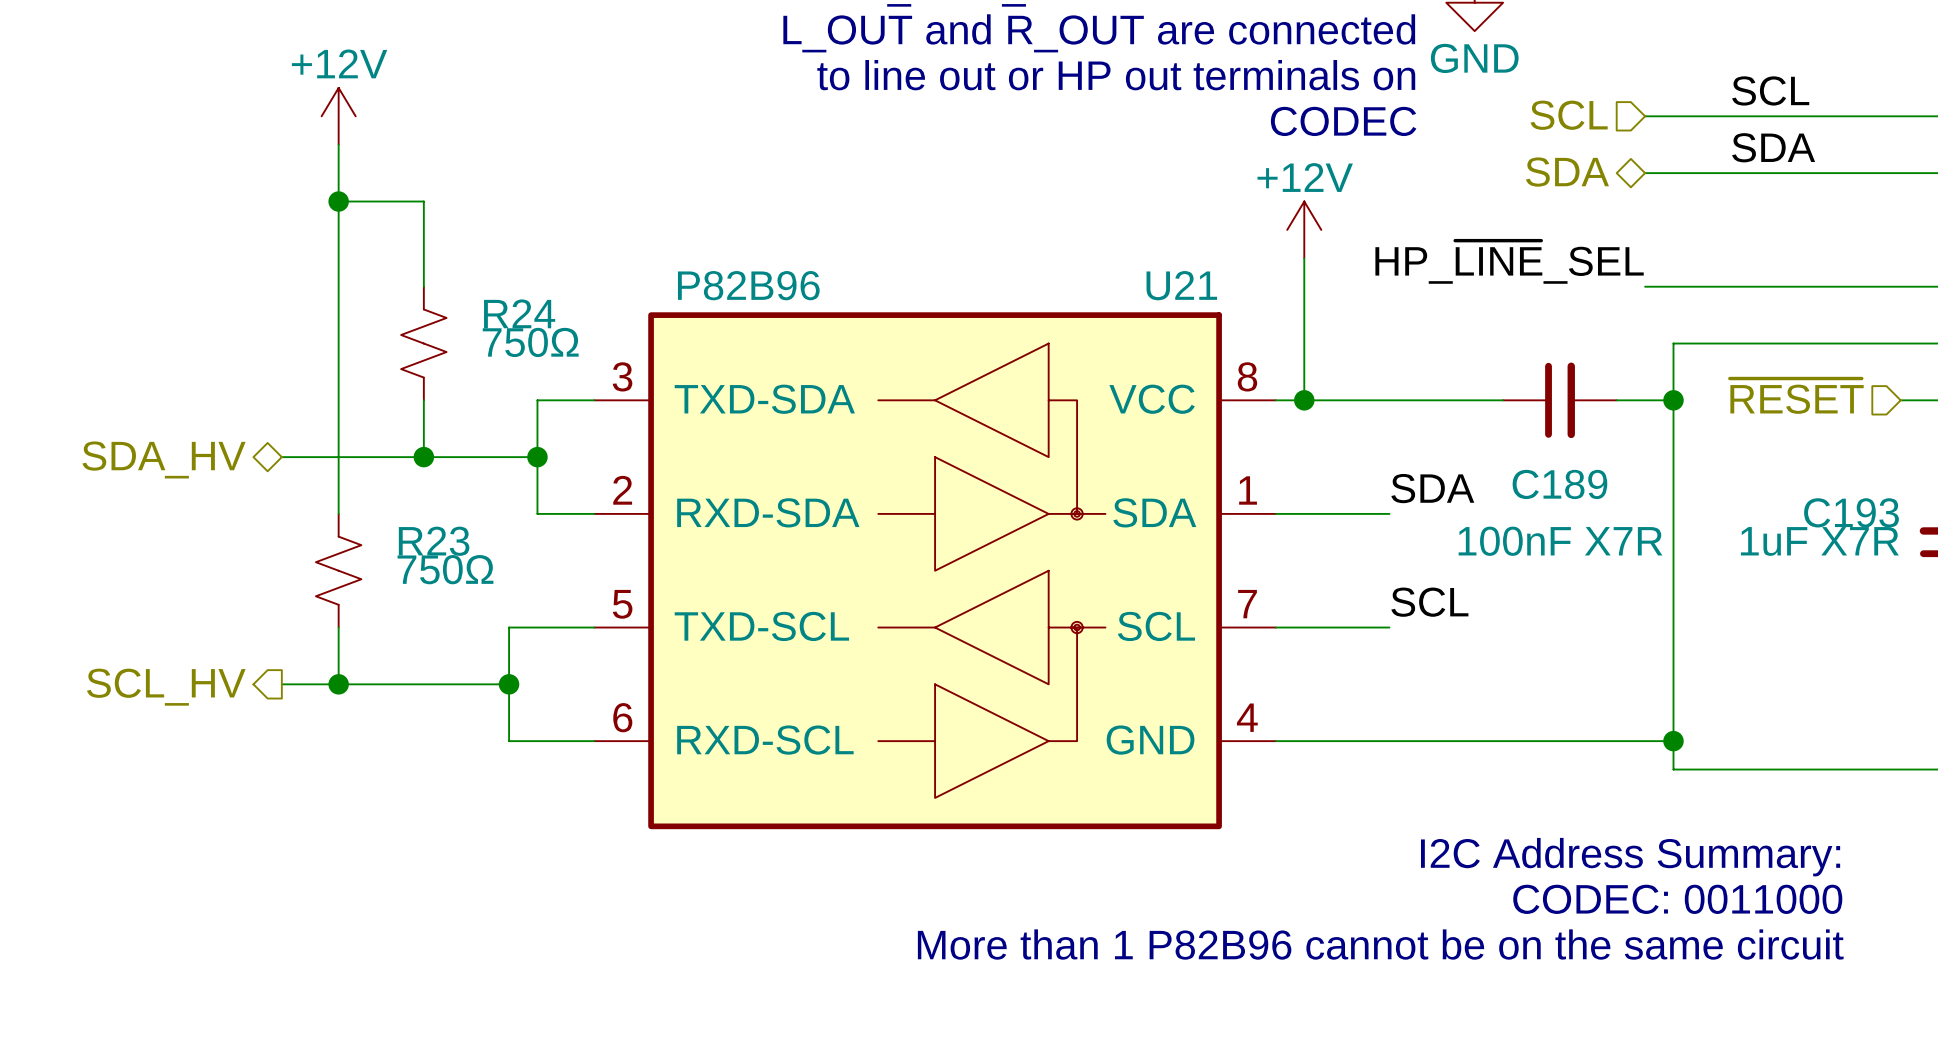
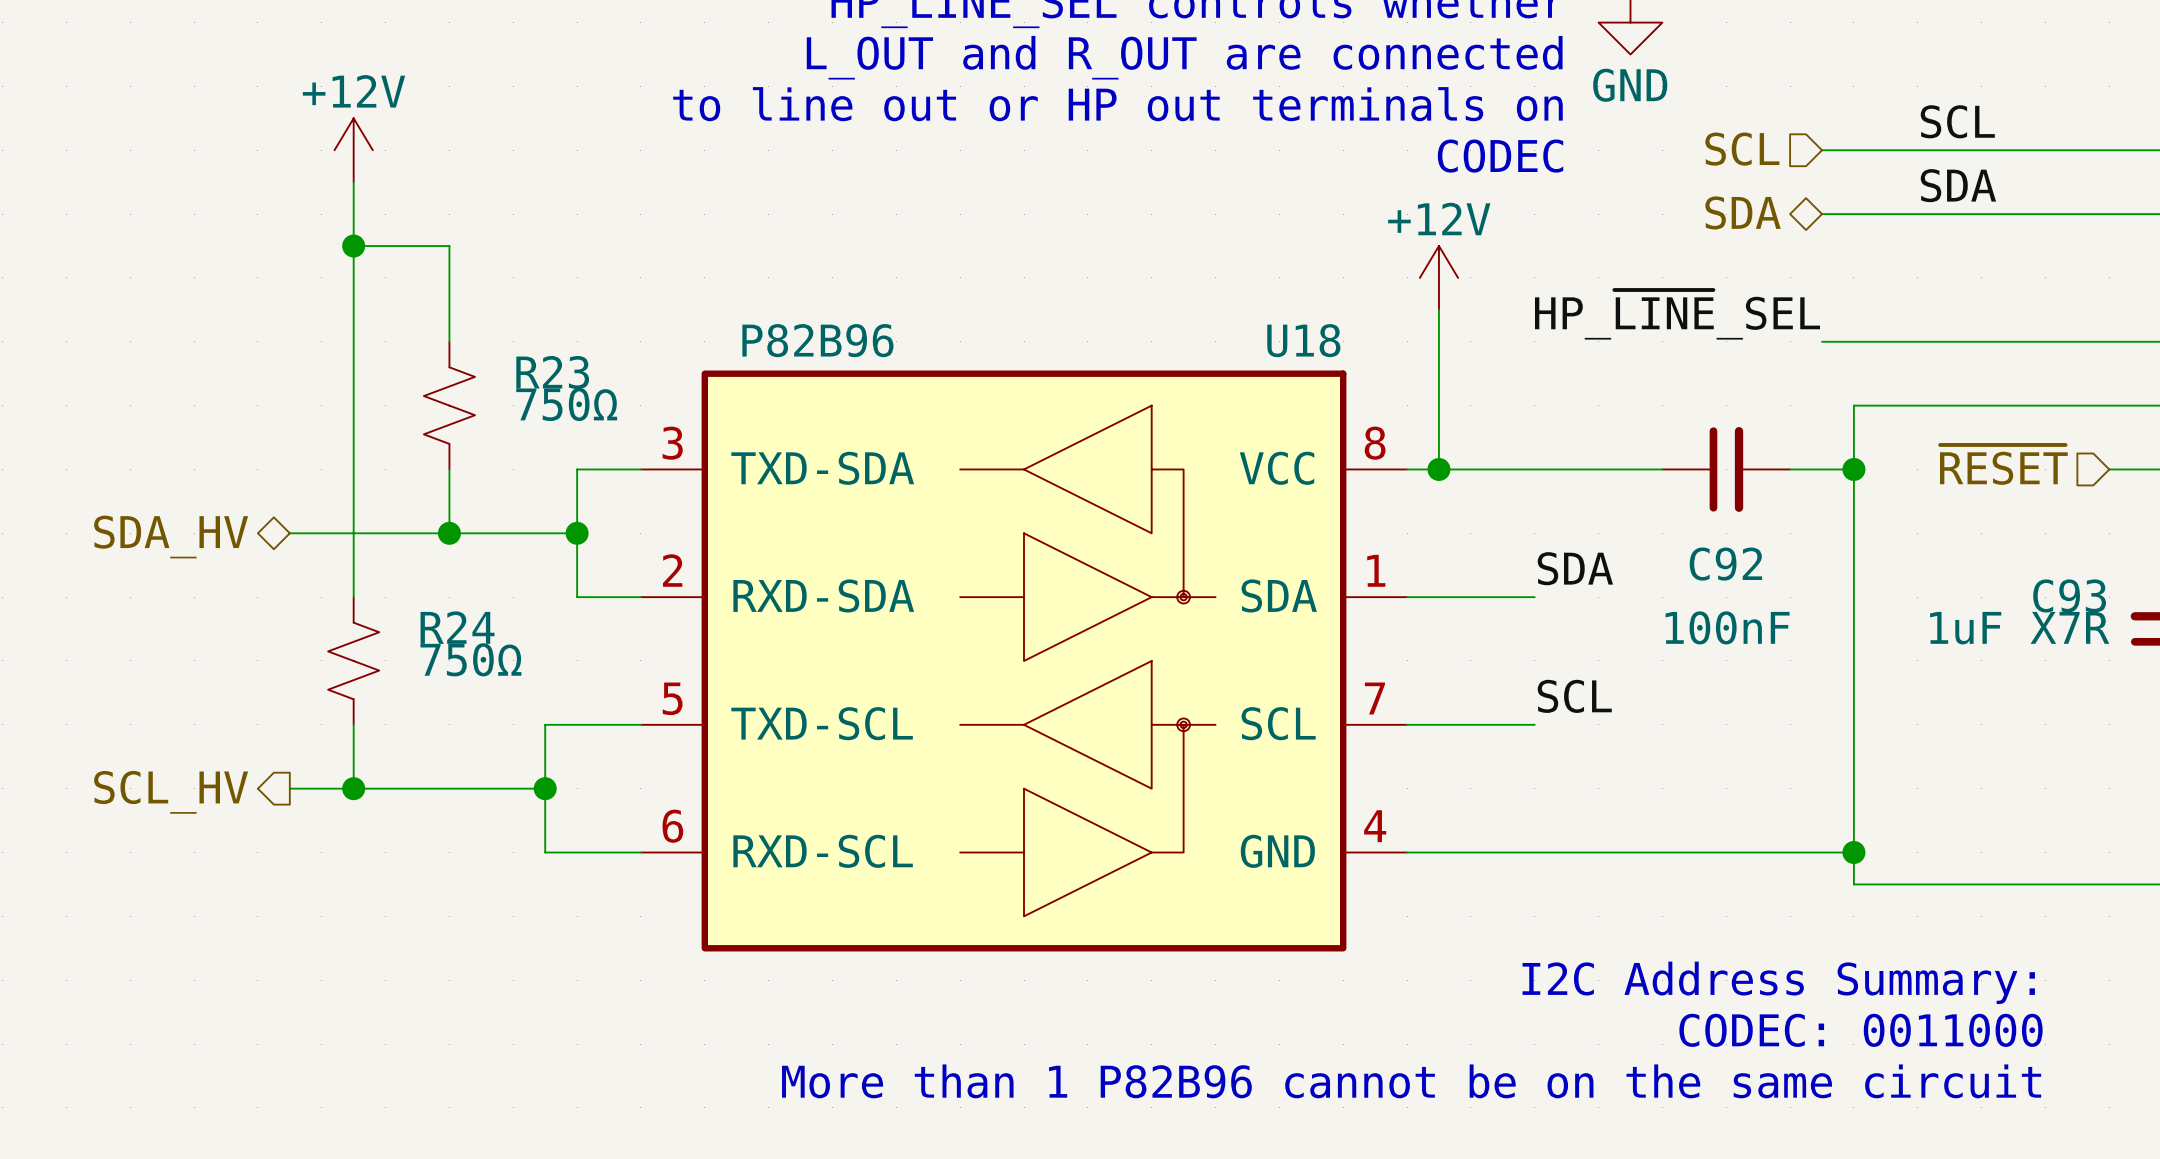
U21 name: U21 (1181, 285) -> U18 (1303, 340)
R24 name: R24 (519, 313) -> R23 (552, 372)
C189 name: C189 (1559, 484) -> C92 (1725, 564)
C193 name: C193 (1851, 512) -> C93 (2069, 595)
R23 name: R23 (434, 541) -> R24 (457, 627)
C189 value: 100nF X7R (1560, 541) -> 100nF (1727, 627)

